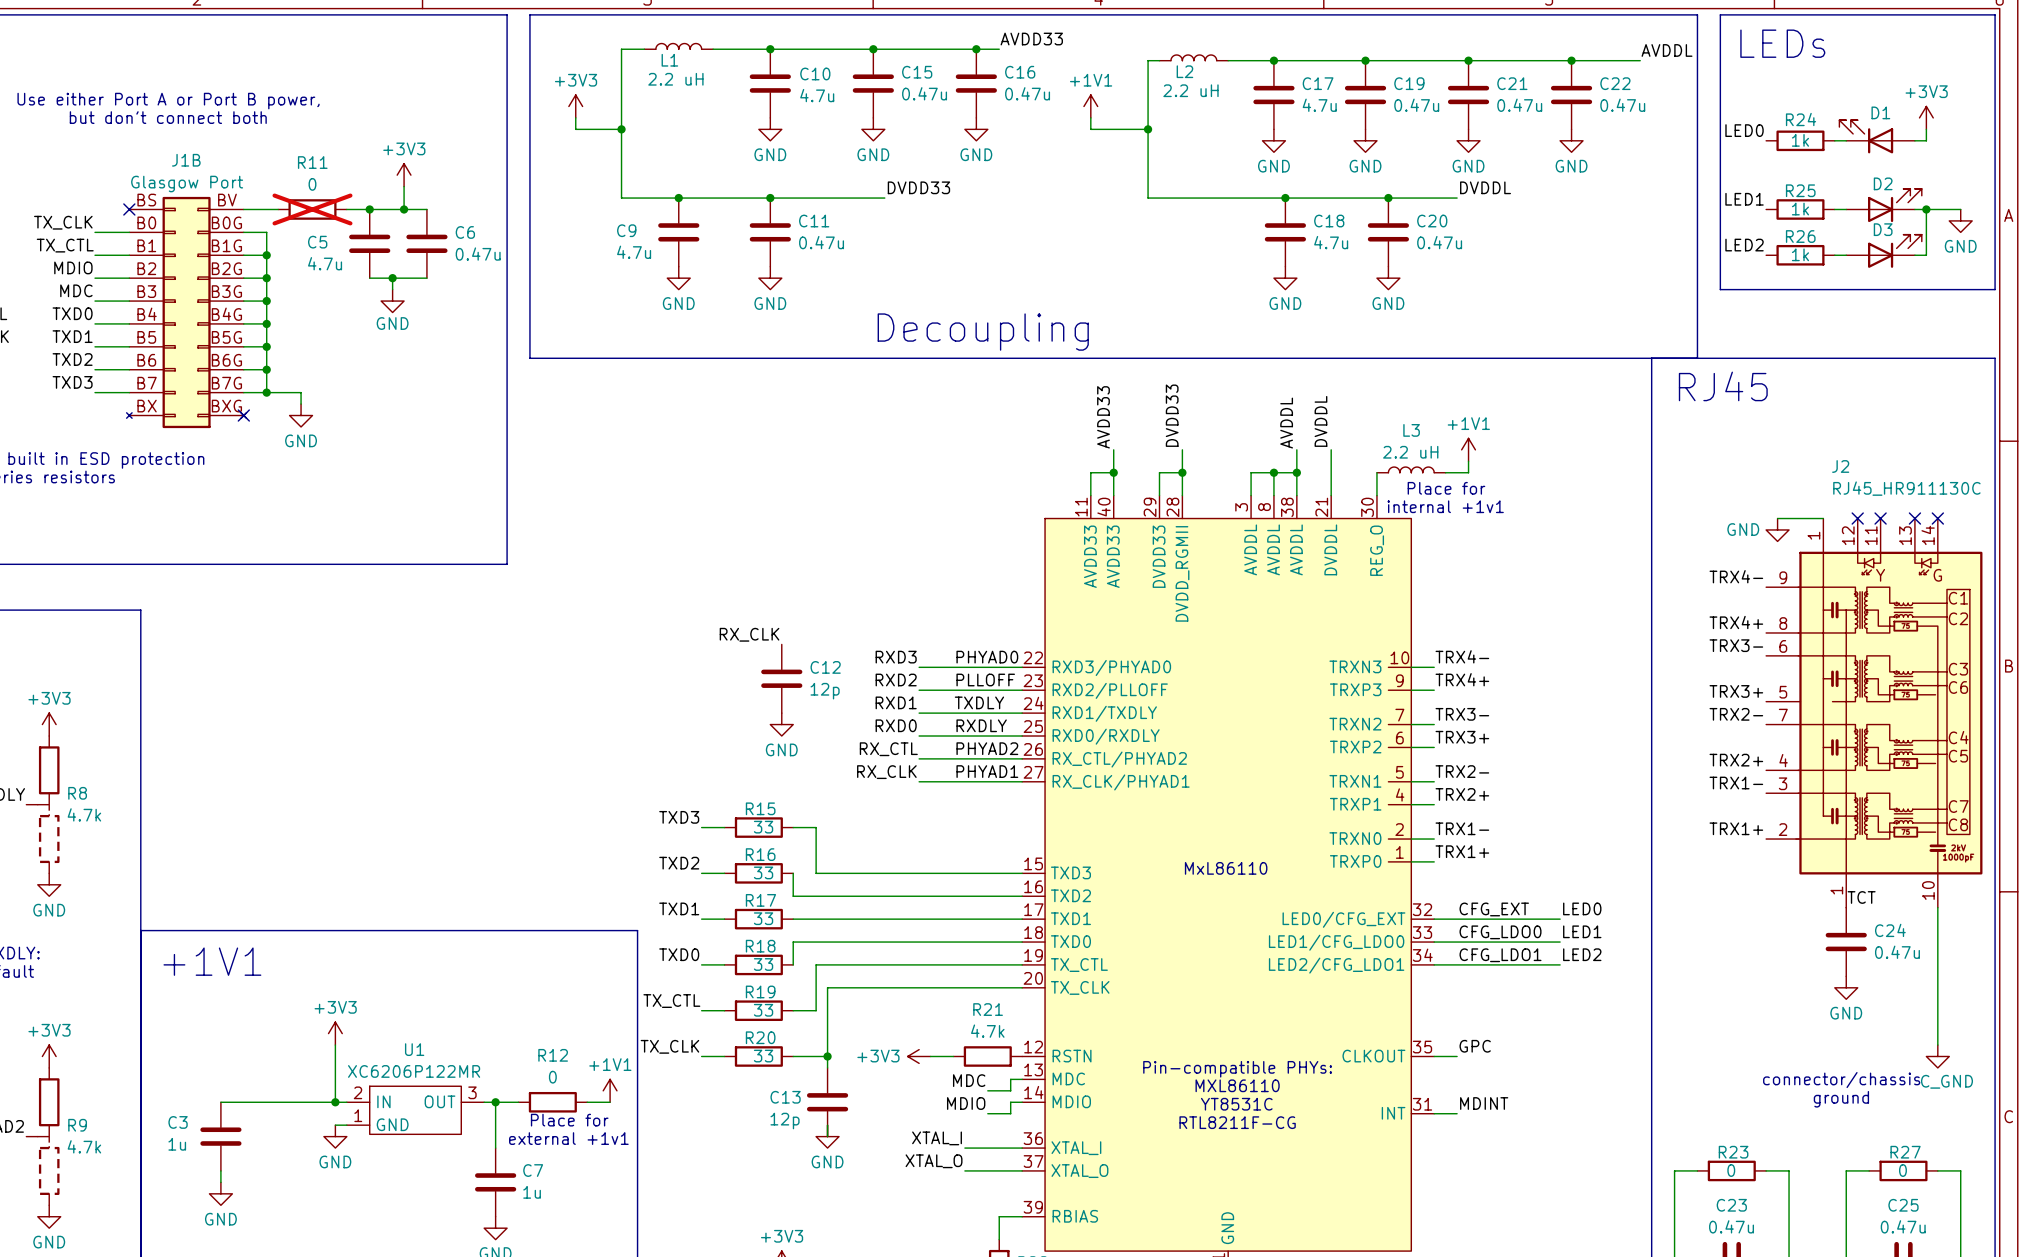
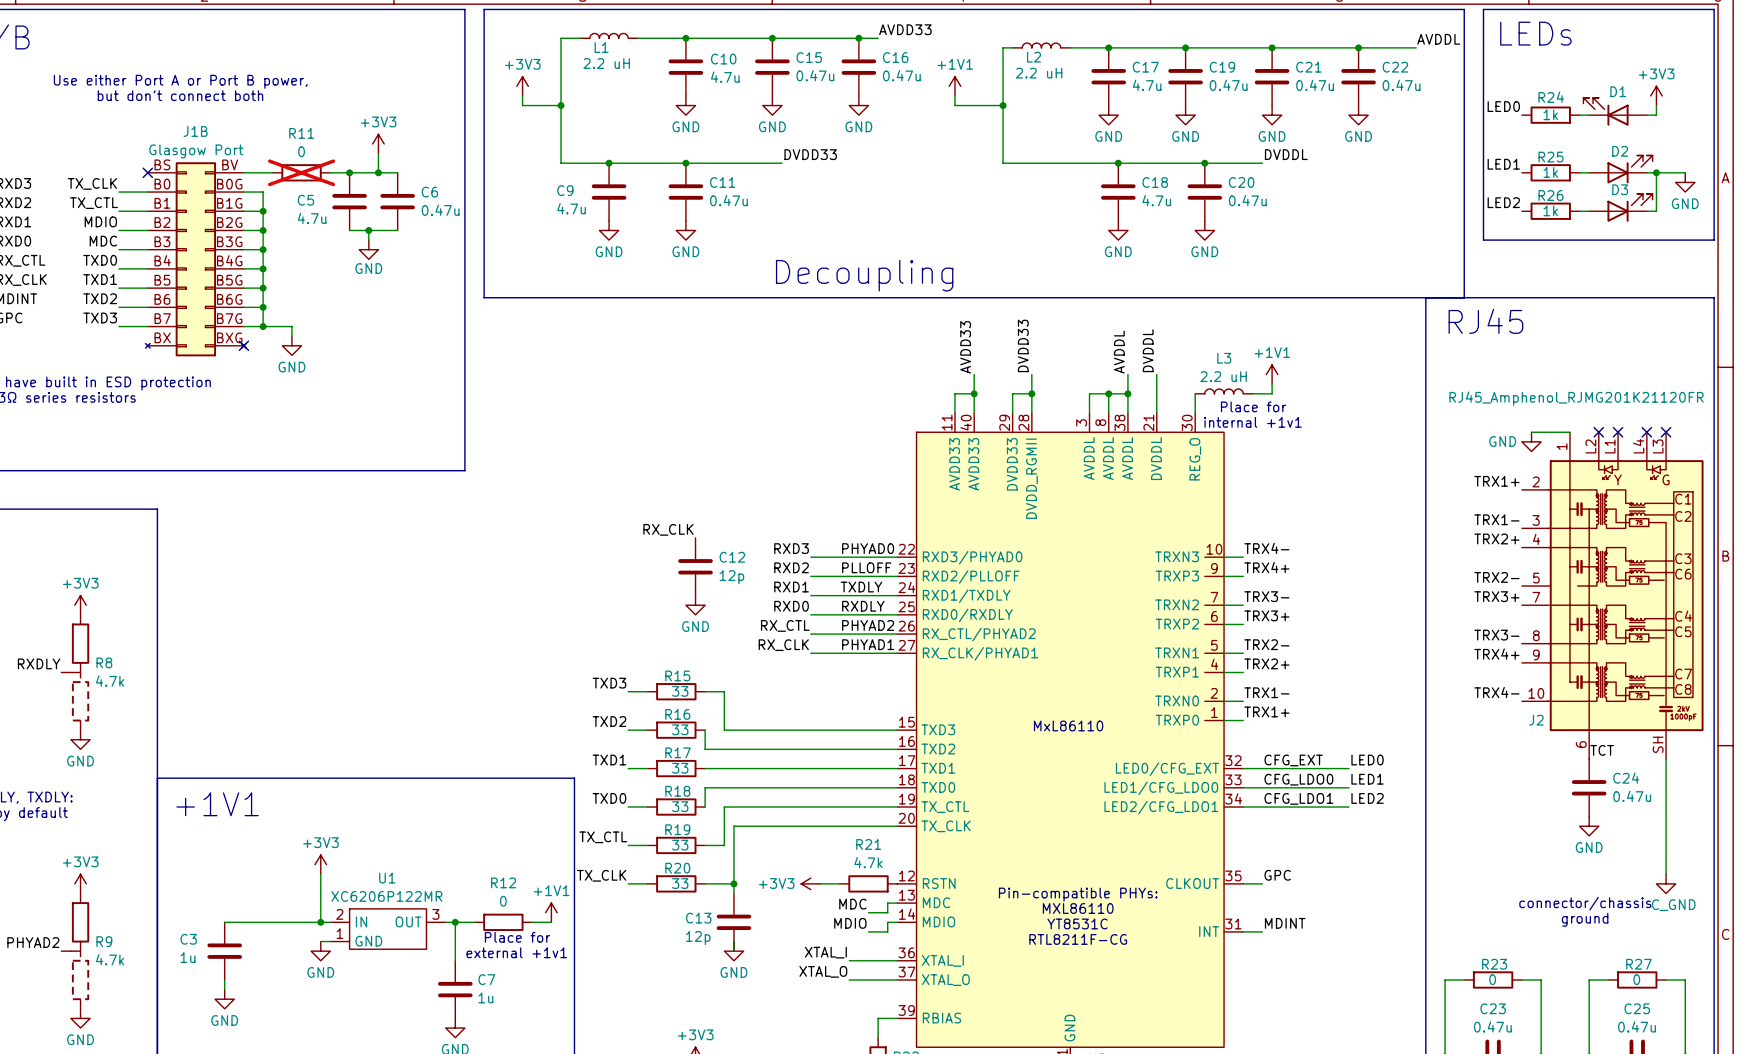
J2 name position: J2 (1840, 466) -> J2 (1536, 720)
J2 value: RJ45_HR911130C (1906, 488) -> RJ45_Amphenol_RJMG201K21120FR (1576, 398)
J2 symbol: [1766, 518, 1983, 908] -> [1521, 432, 1704, 759]
label: TRX4- (1736, 576) -> TRX1+ (1496, 481)
label: TRX4+ (1736, 622) -> TRX1- (1496, 519)
label: TRX3- (1736, 645) -> TRX2+ (1496, 538)
label: TRX3+ (1736, 691) -> TRX2- (1496, 577)
label: TRX2- (1736, 714) -> TRX3+ (1496, 596)
label: TRX2+ (1736, 760) -> TRX3- (1496, 635)
label: TRX1- (1736, 783) -> TRX4+ (1496, 654)
label: TRX1+ (1736, 828) -> TRX4- (1496, 692)

